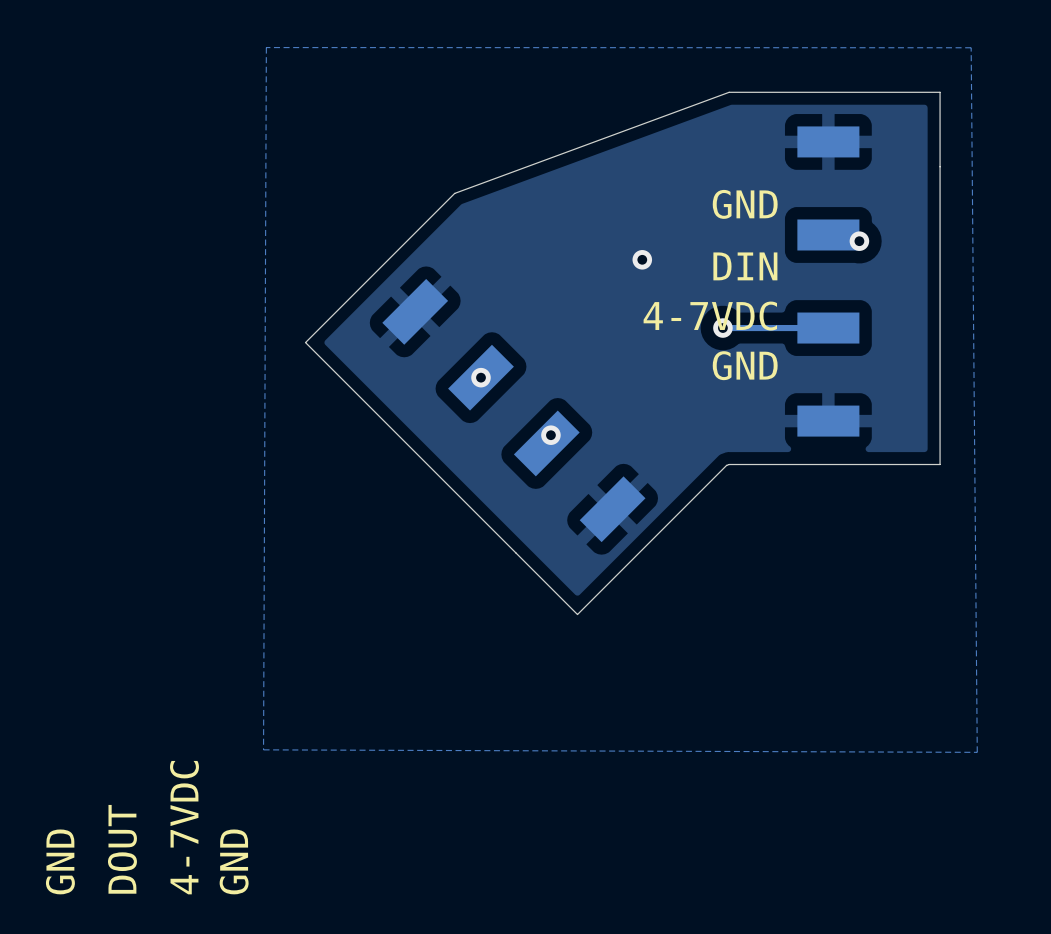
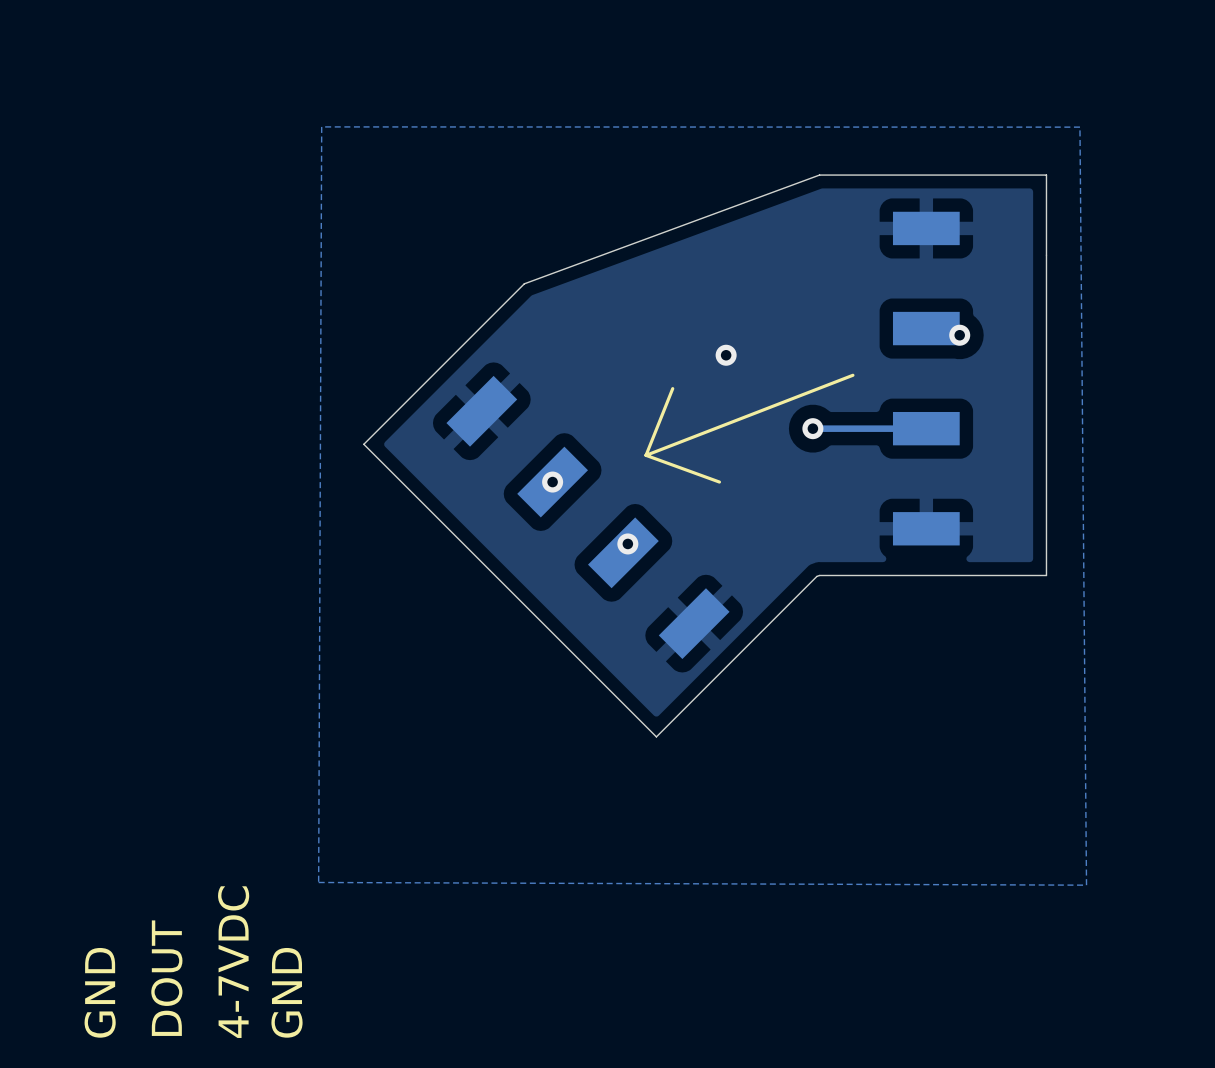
text: GND (745, 204) -> none
text: DIN (745, 266) -> none
line: none -> (852, 375) (646, 455)
line: none -> (672, 388) (646, 455)
text: 4-7VDC (710, 316) -> none
line: none -> (646, 455) (719, 482)
text: GND (745, 365) -> none

